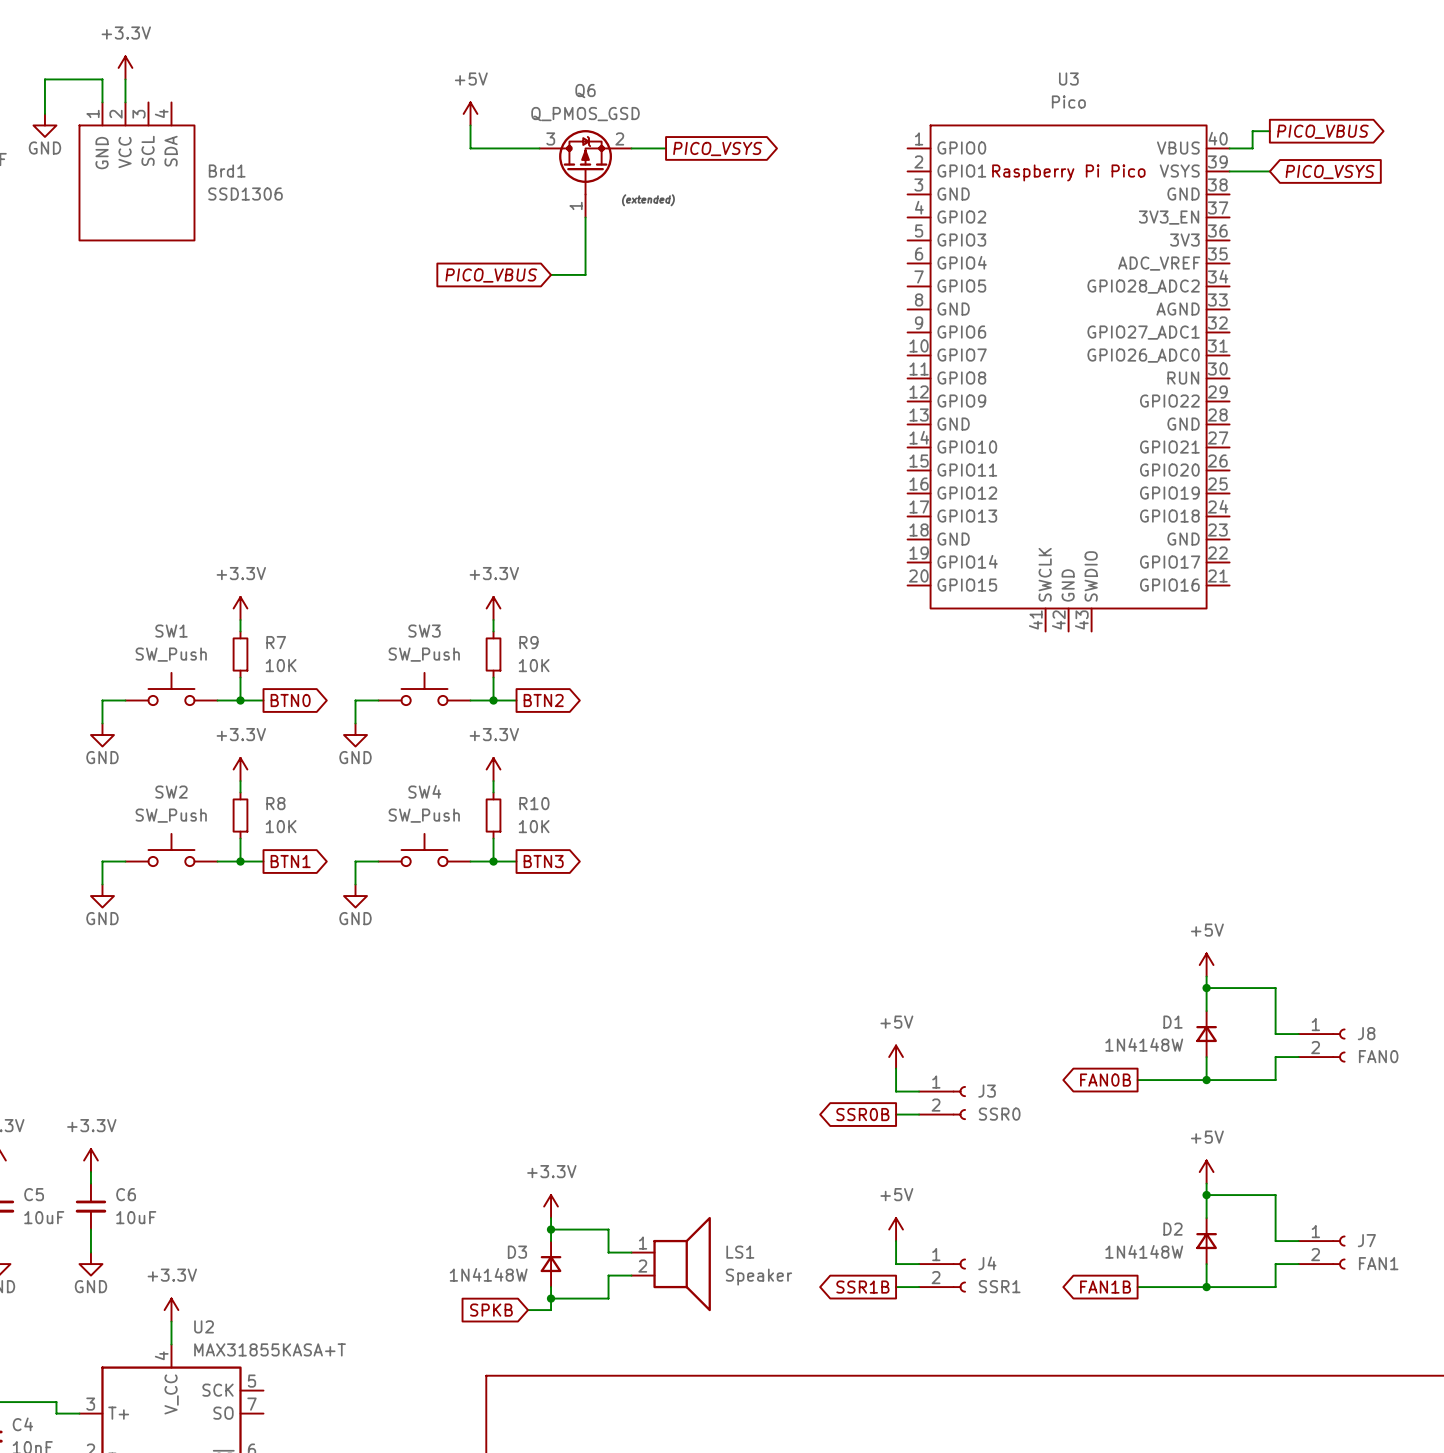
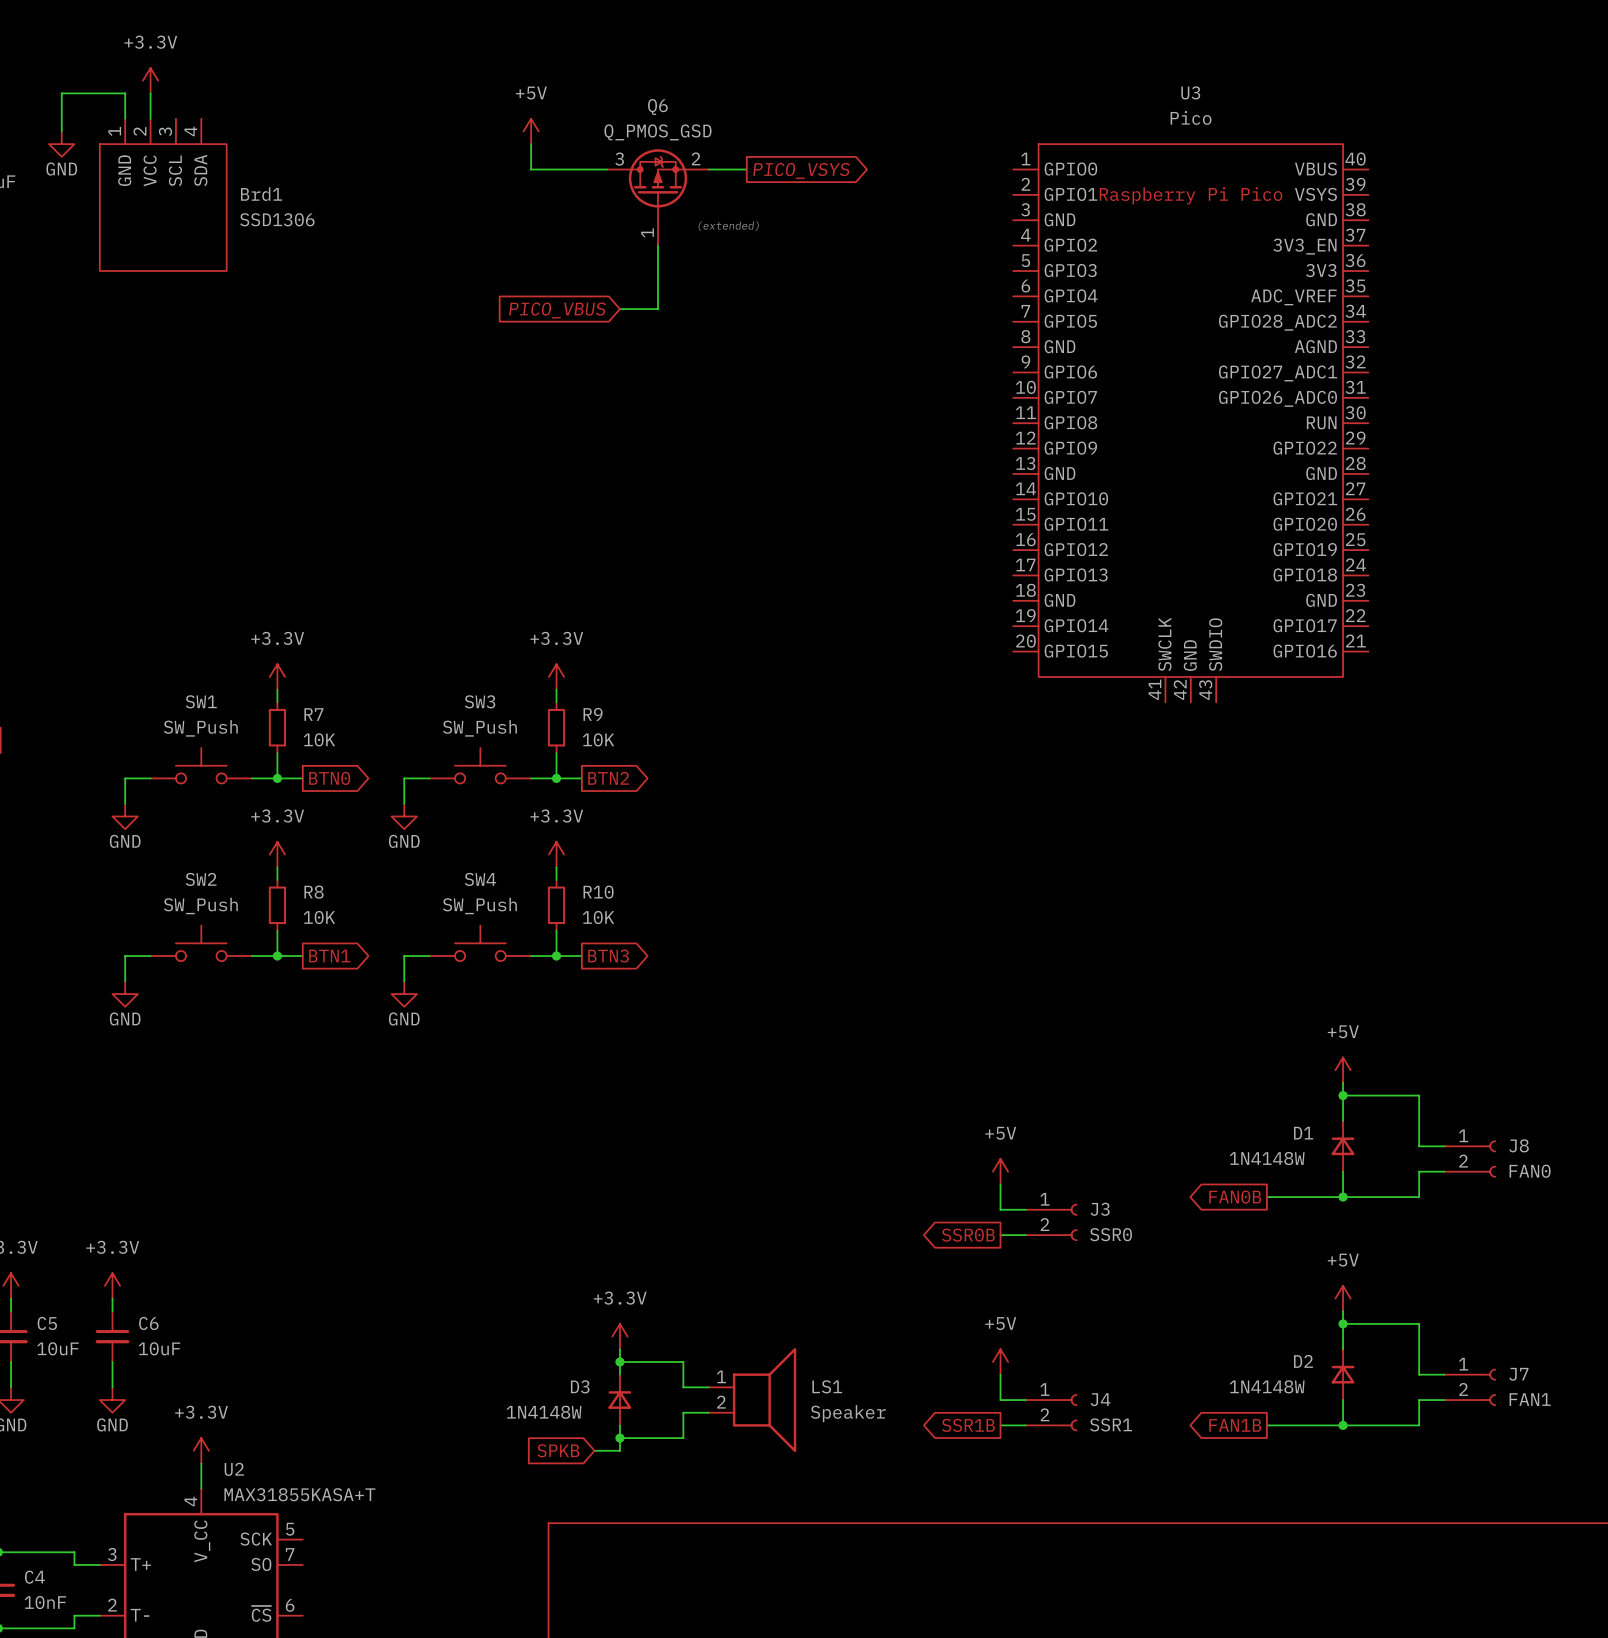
wire: (1269, 131) (1252, 131) (1252, 148) (1229, 148) -> none
global label: PICO_VBUS (1322, 131) -> none
wire: (1229, 171) (1269, 171) -> none
global label: PICO_VSYS (1330, 171) -> none

